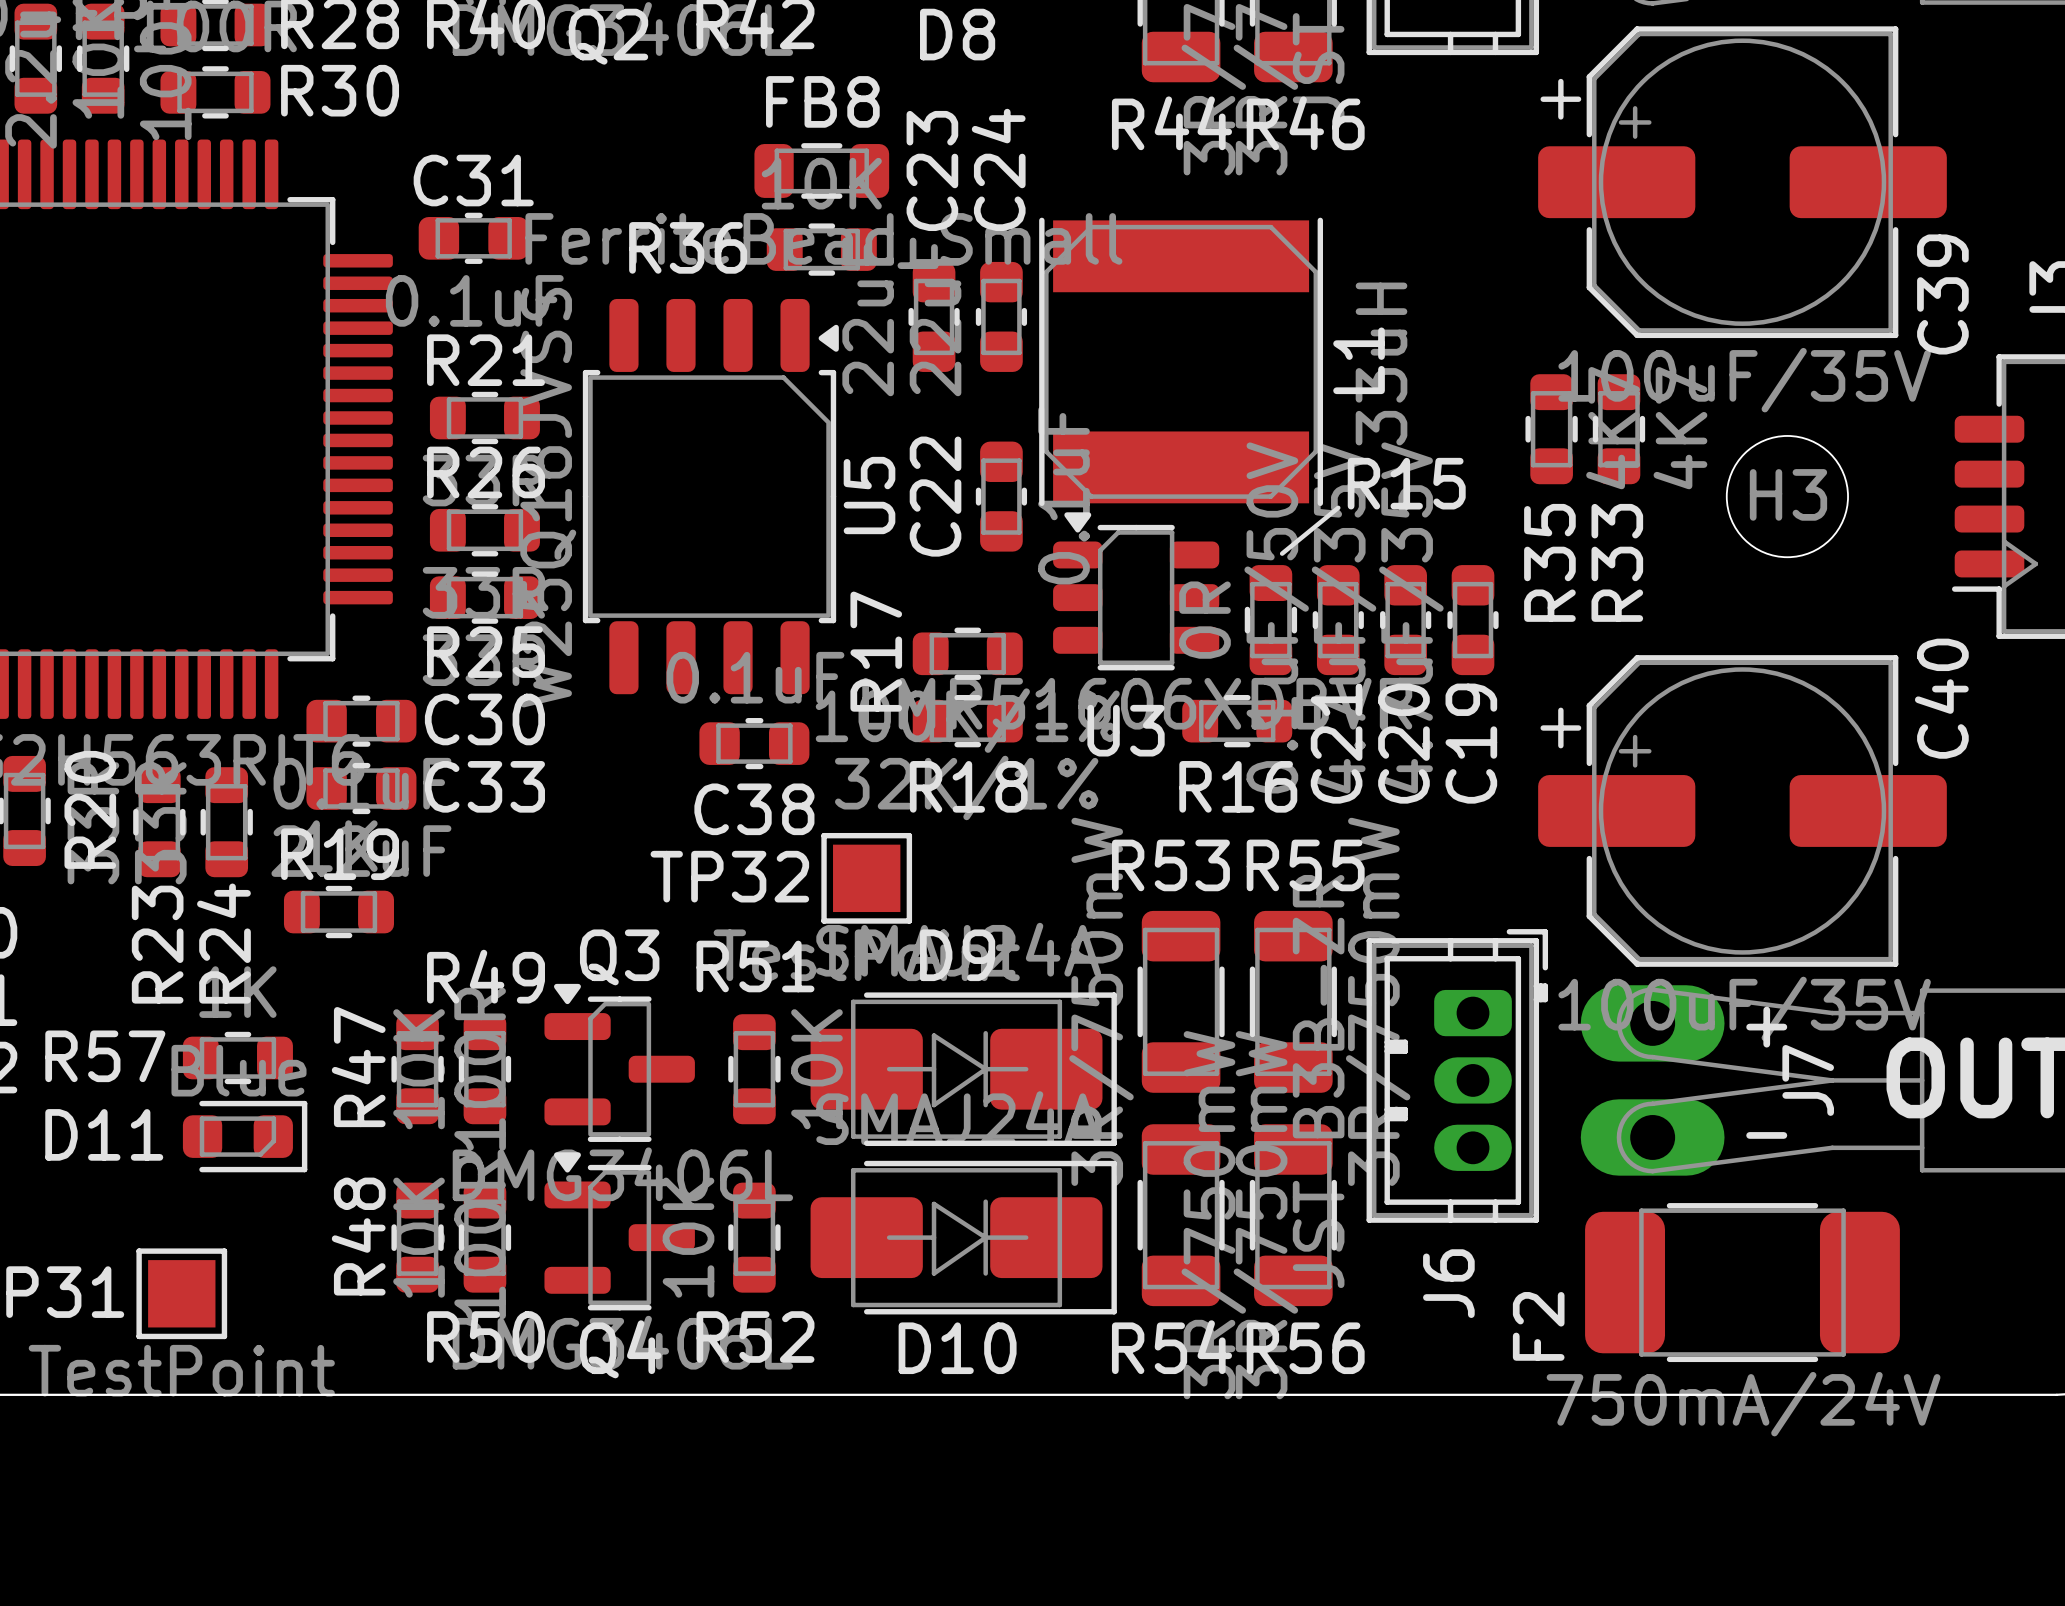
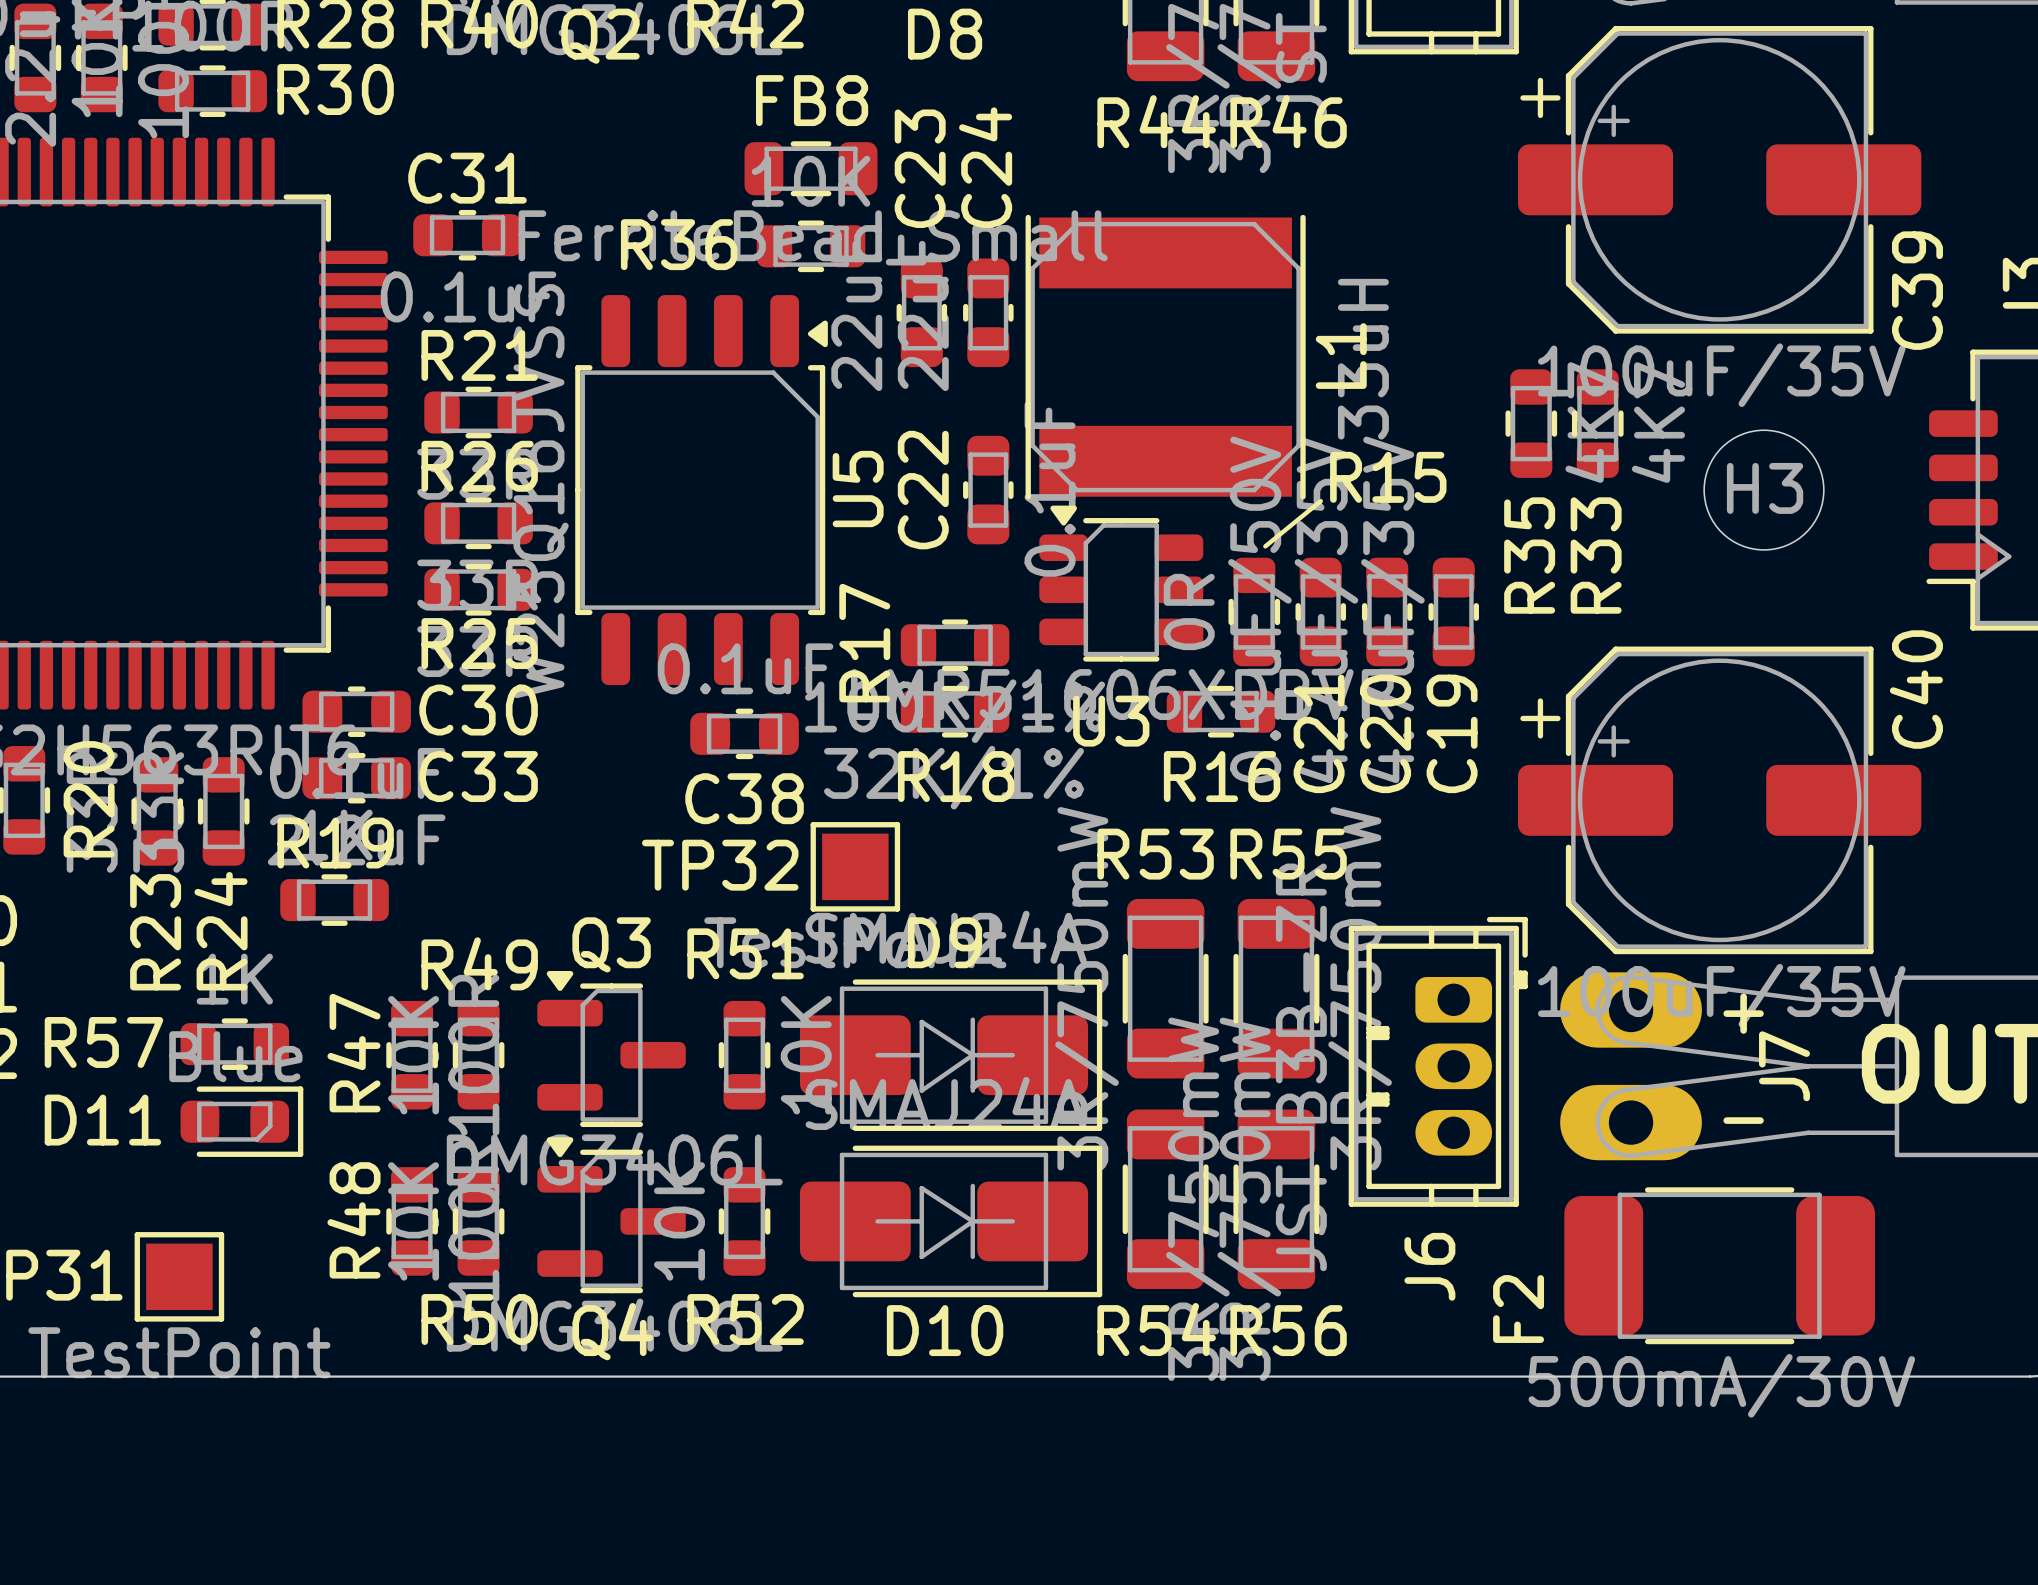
F2 value: 750mA/24V (1743, 1404) -> 500mA/30V (1721, 1385)

